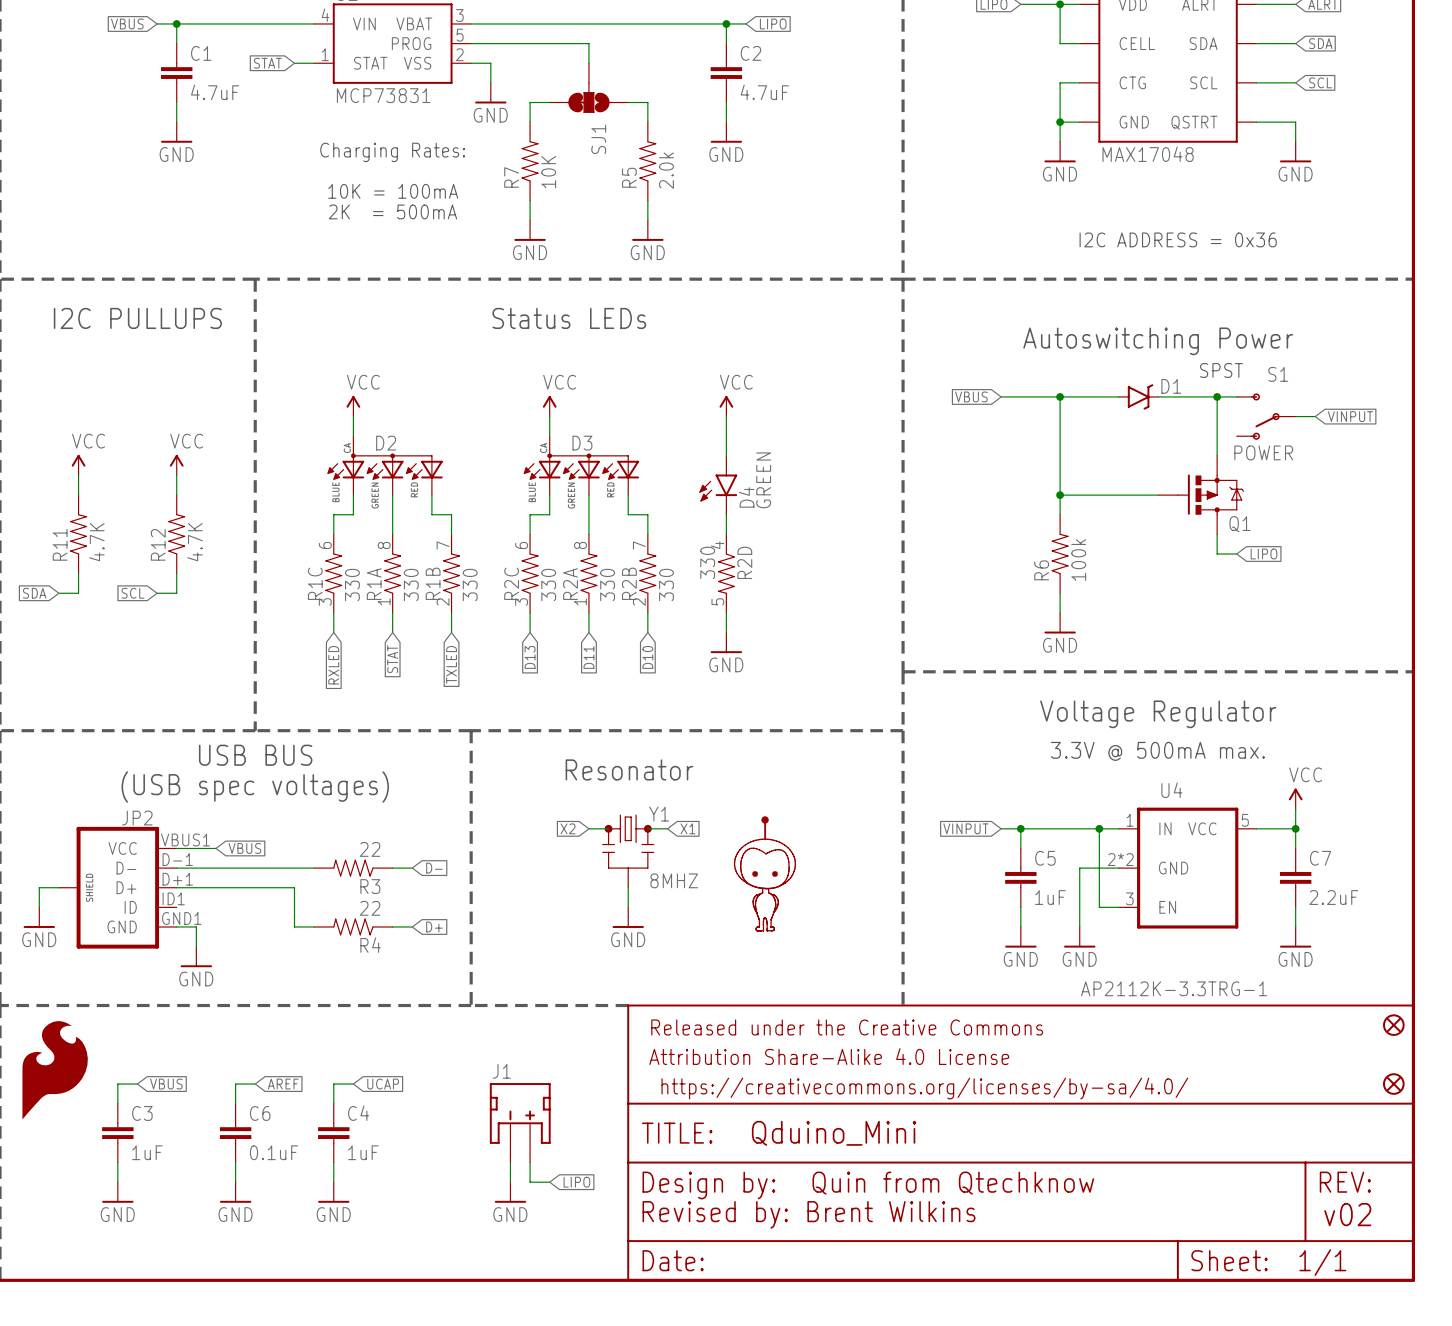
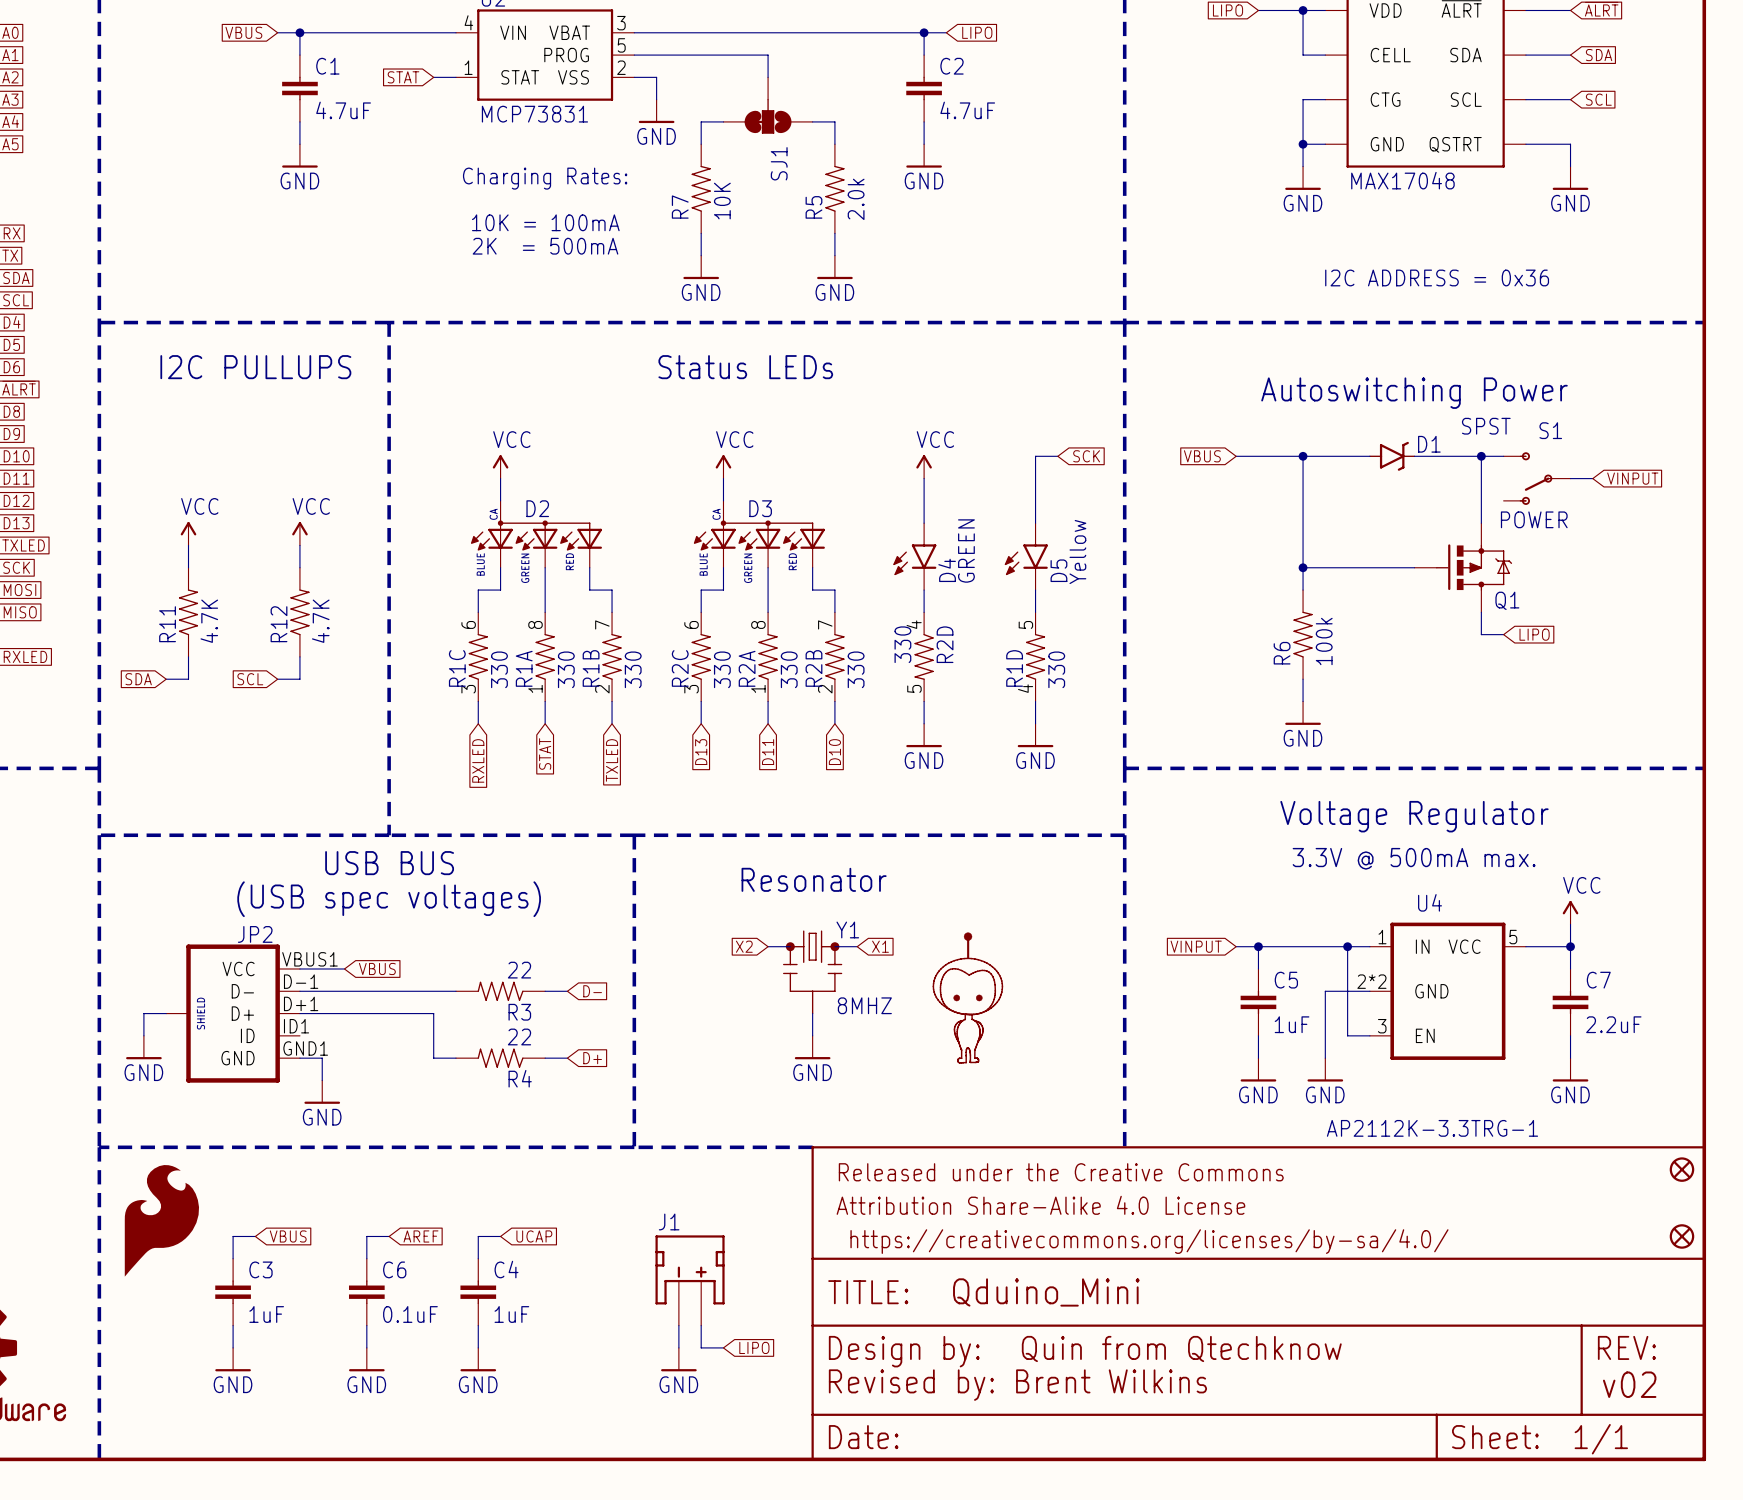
wire: none -> (1057, 456) (1035, 456) (1035, 523)
global label: none -> SCK (1086, 456)
D5: none -> Yellow (1026, 556)
wire: none -> (1035, 590) (1035, 612)
R1D: none -> 330 (1035, 656)
wire: none -> (1035, 701) (1035, 723)
power symbol: none -> GND (1035, 735)

